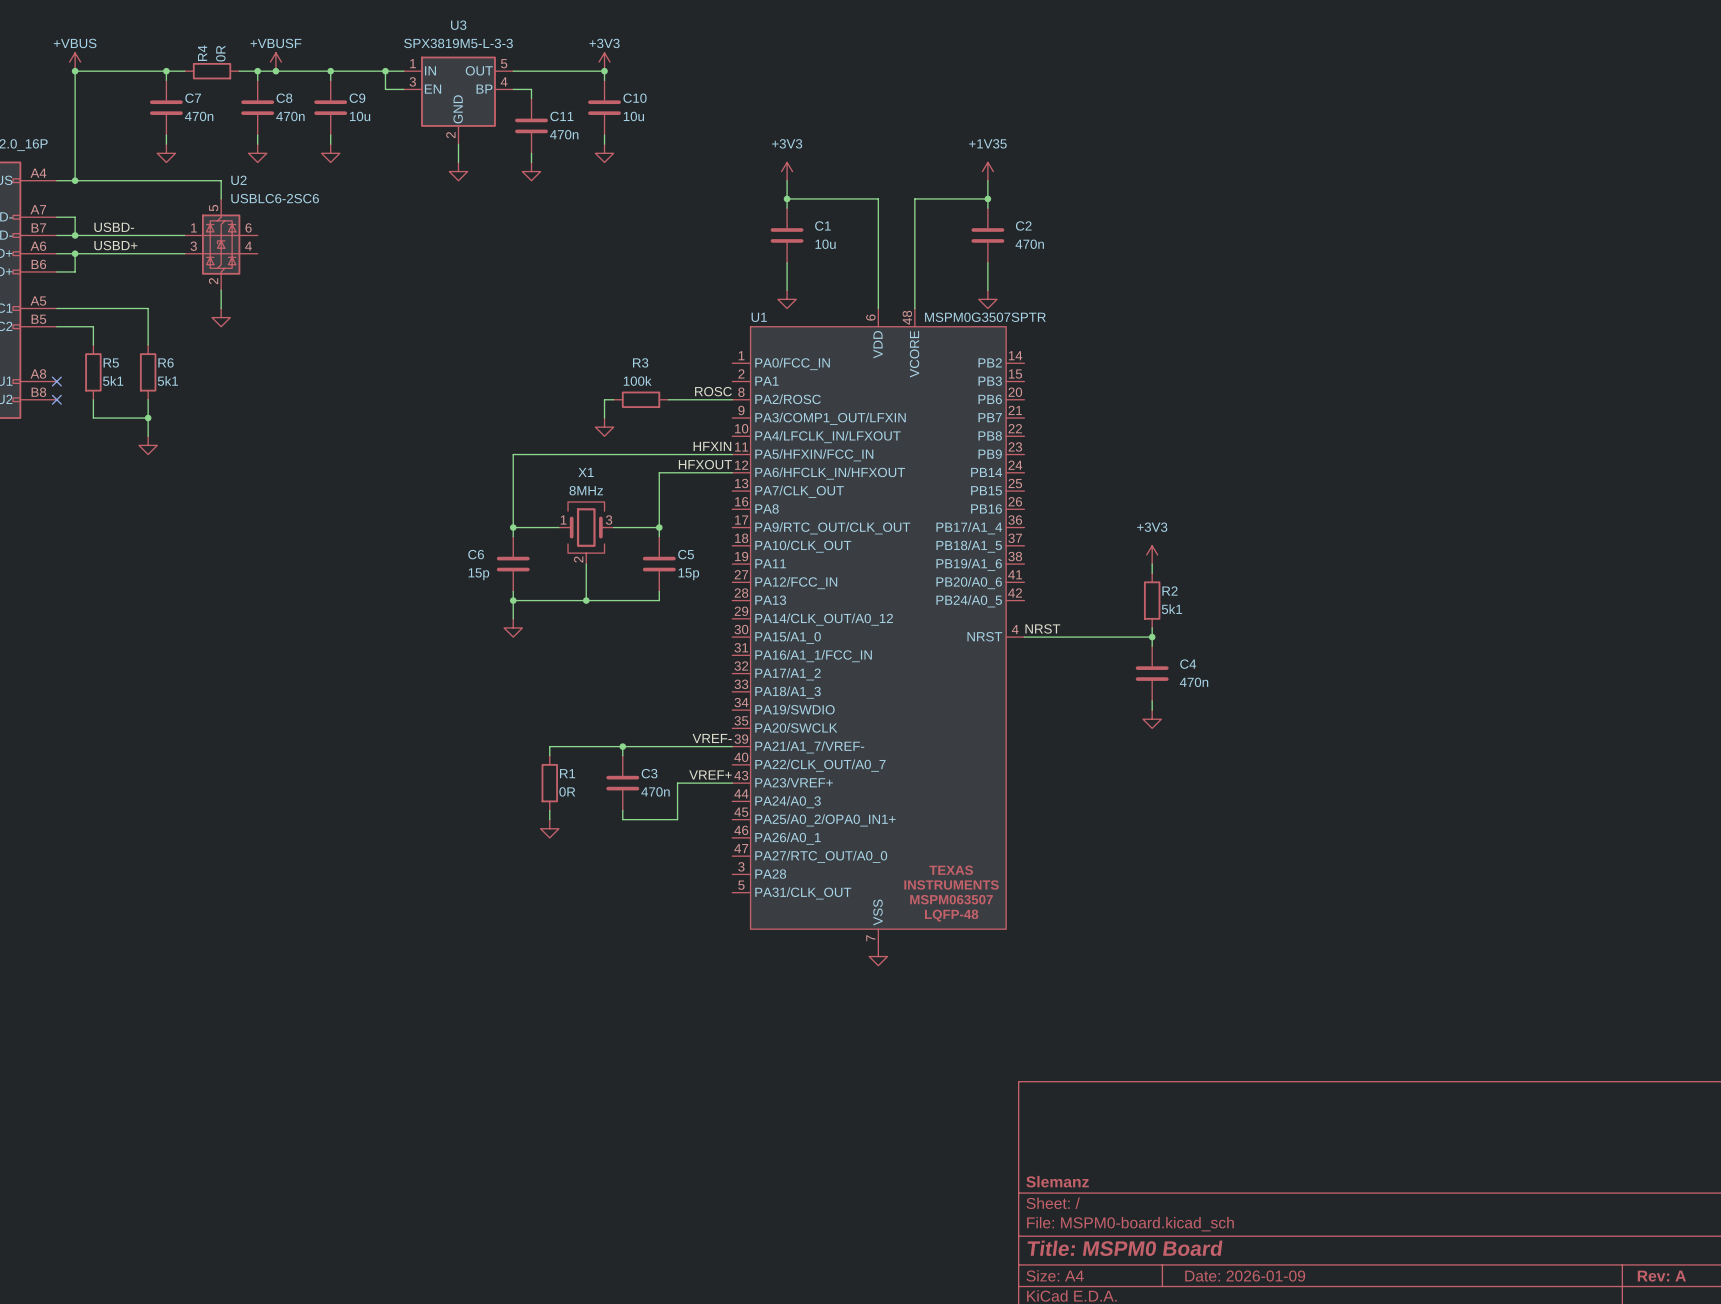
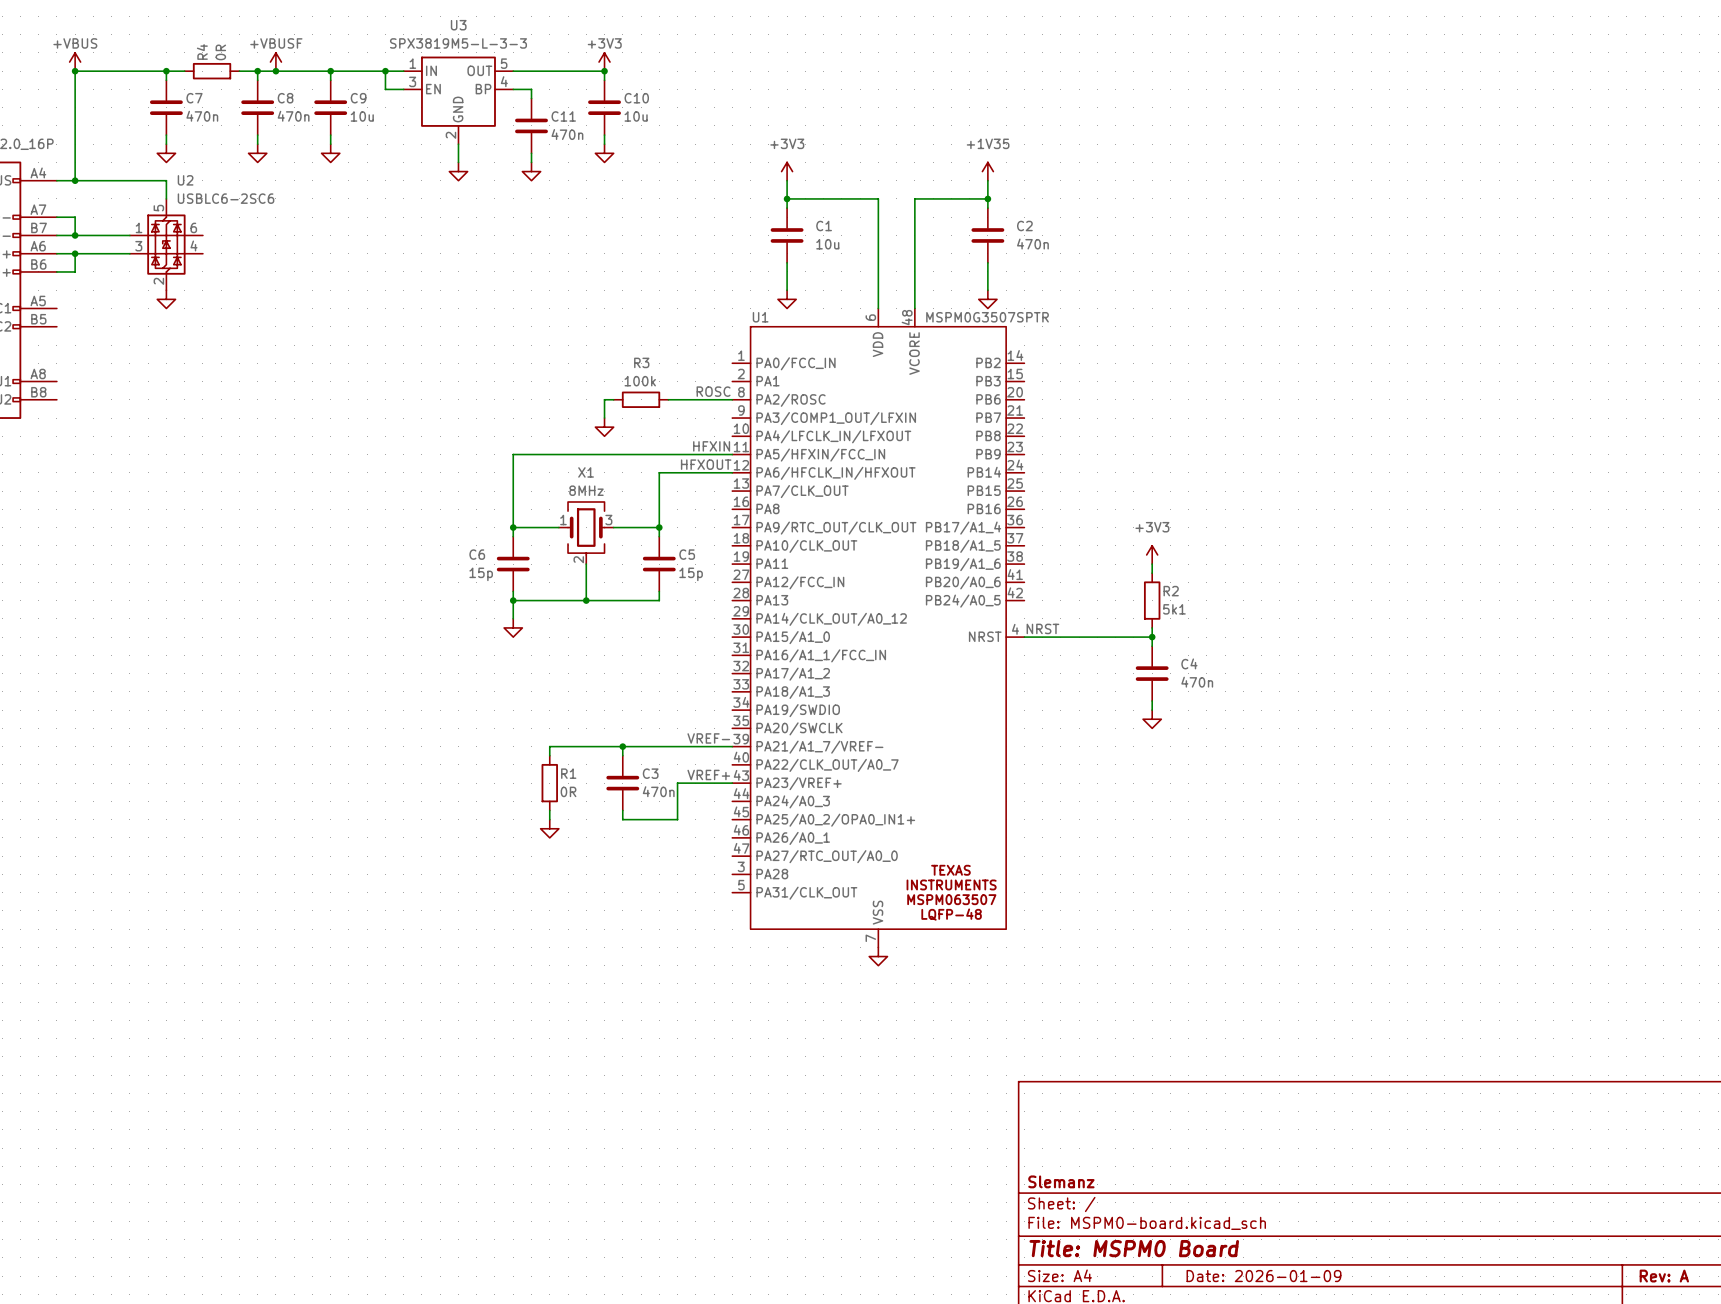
wire: (166, 180) (221, 180) (221, 198) -> (166, 180) (166, 198)
label: USBD- (114, 227) -> none
U2 position: (221, 244) -> (166, 244)
label: USBD+ (115, 245) -> none
wire: (221, 290) (221, 308) -> none
wire: (56, 308) (148, 308) (148, 345) -> none
power symbol position: (221, 317) -> (166, 299)
wire: (56, 326) (93, 326) (93, 345) -> none
R5: 5k1 (93, 372) -> none
R6: 5k1 (148, 372) -> none
no-connect mark: (56, 381) -> none
no-connect mark: (56, 399) -> none
wire: (93, 399) (93, 418) (148, 418) -> none
wire: (148, 399) (148, 436) -> none
junction: (148, 418) -> none
power symbol: (148, 445) -> none

